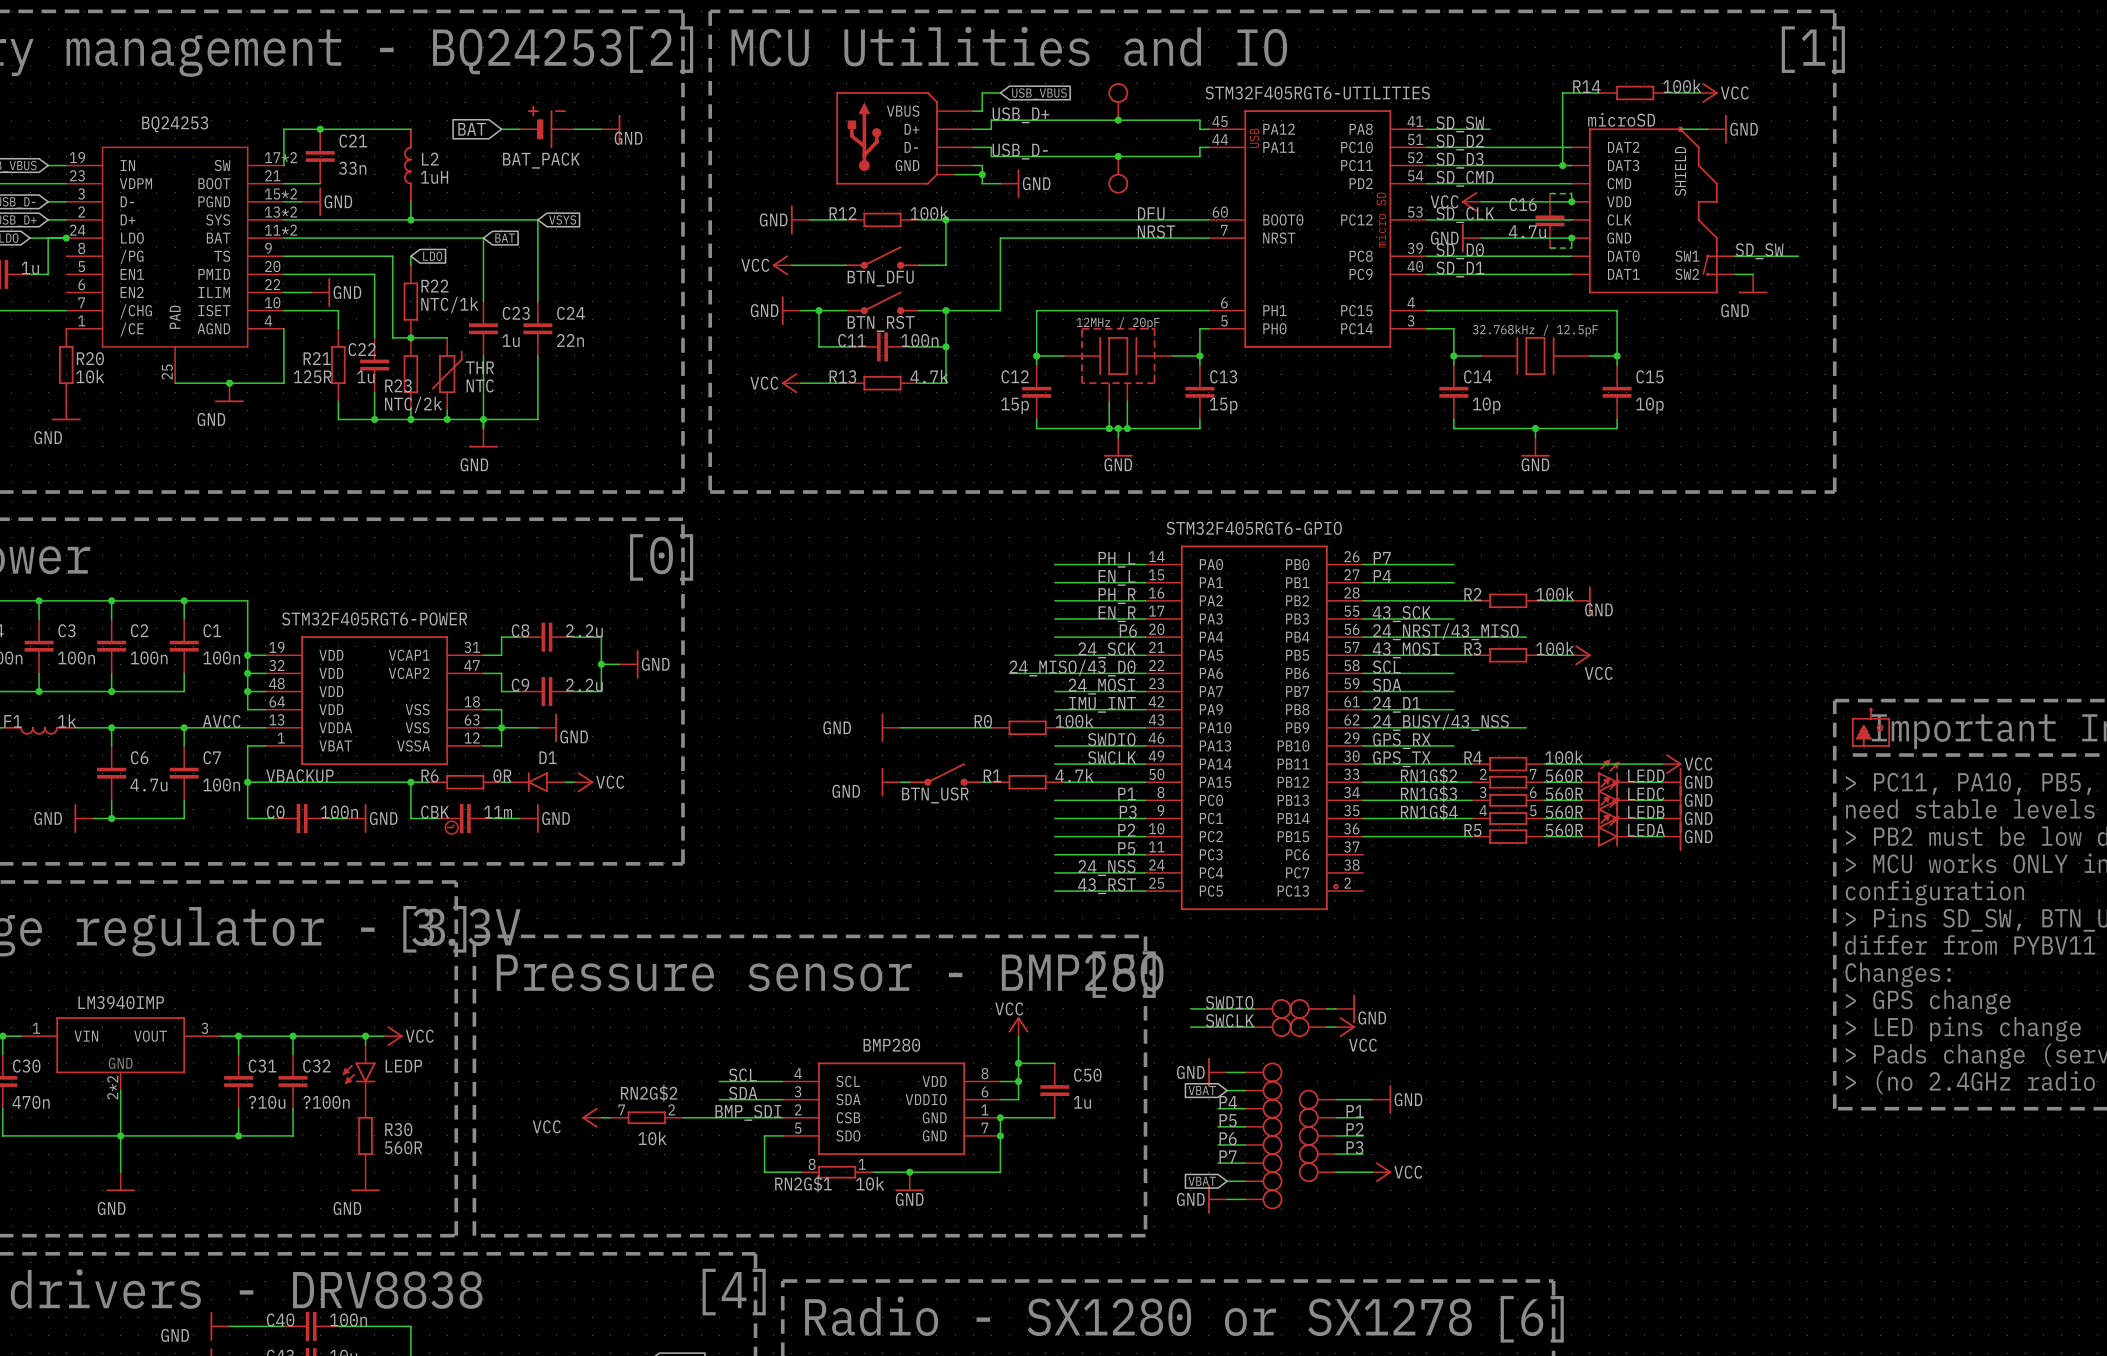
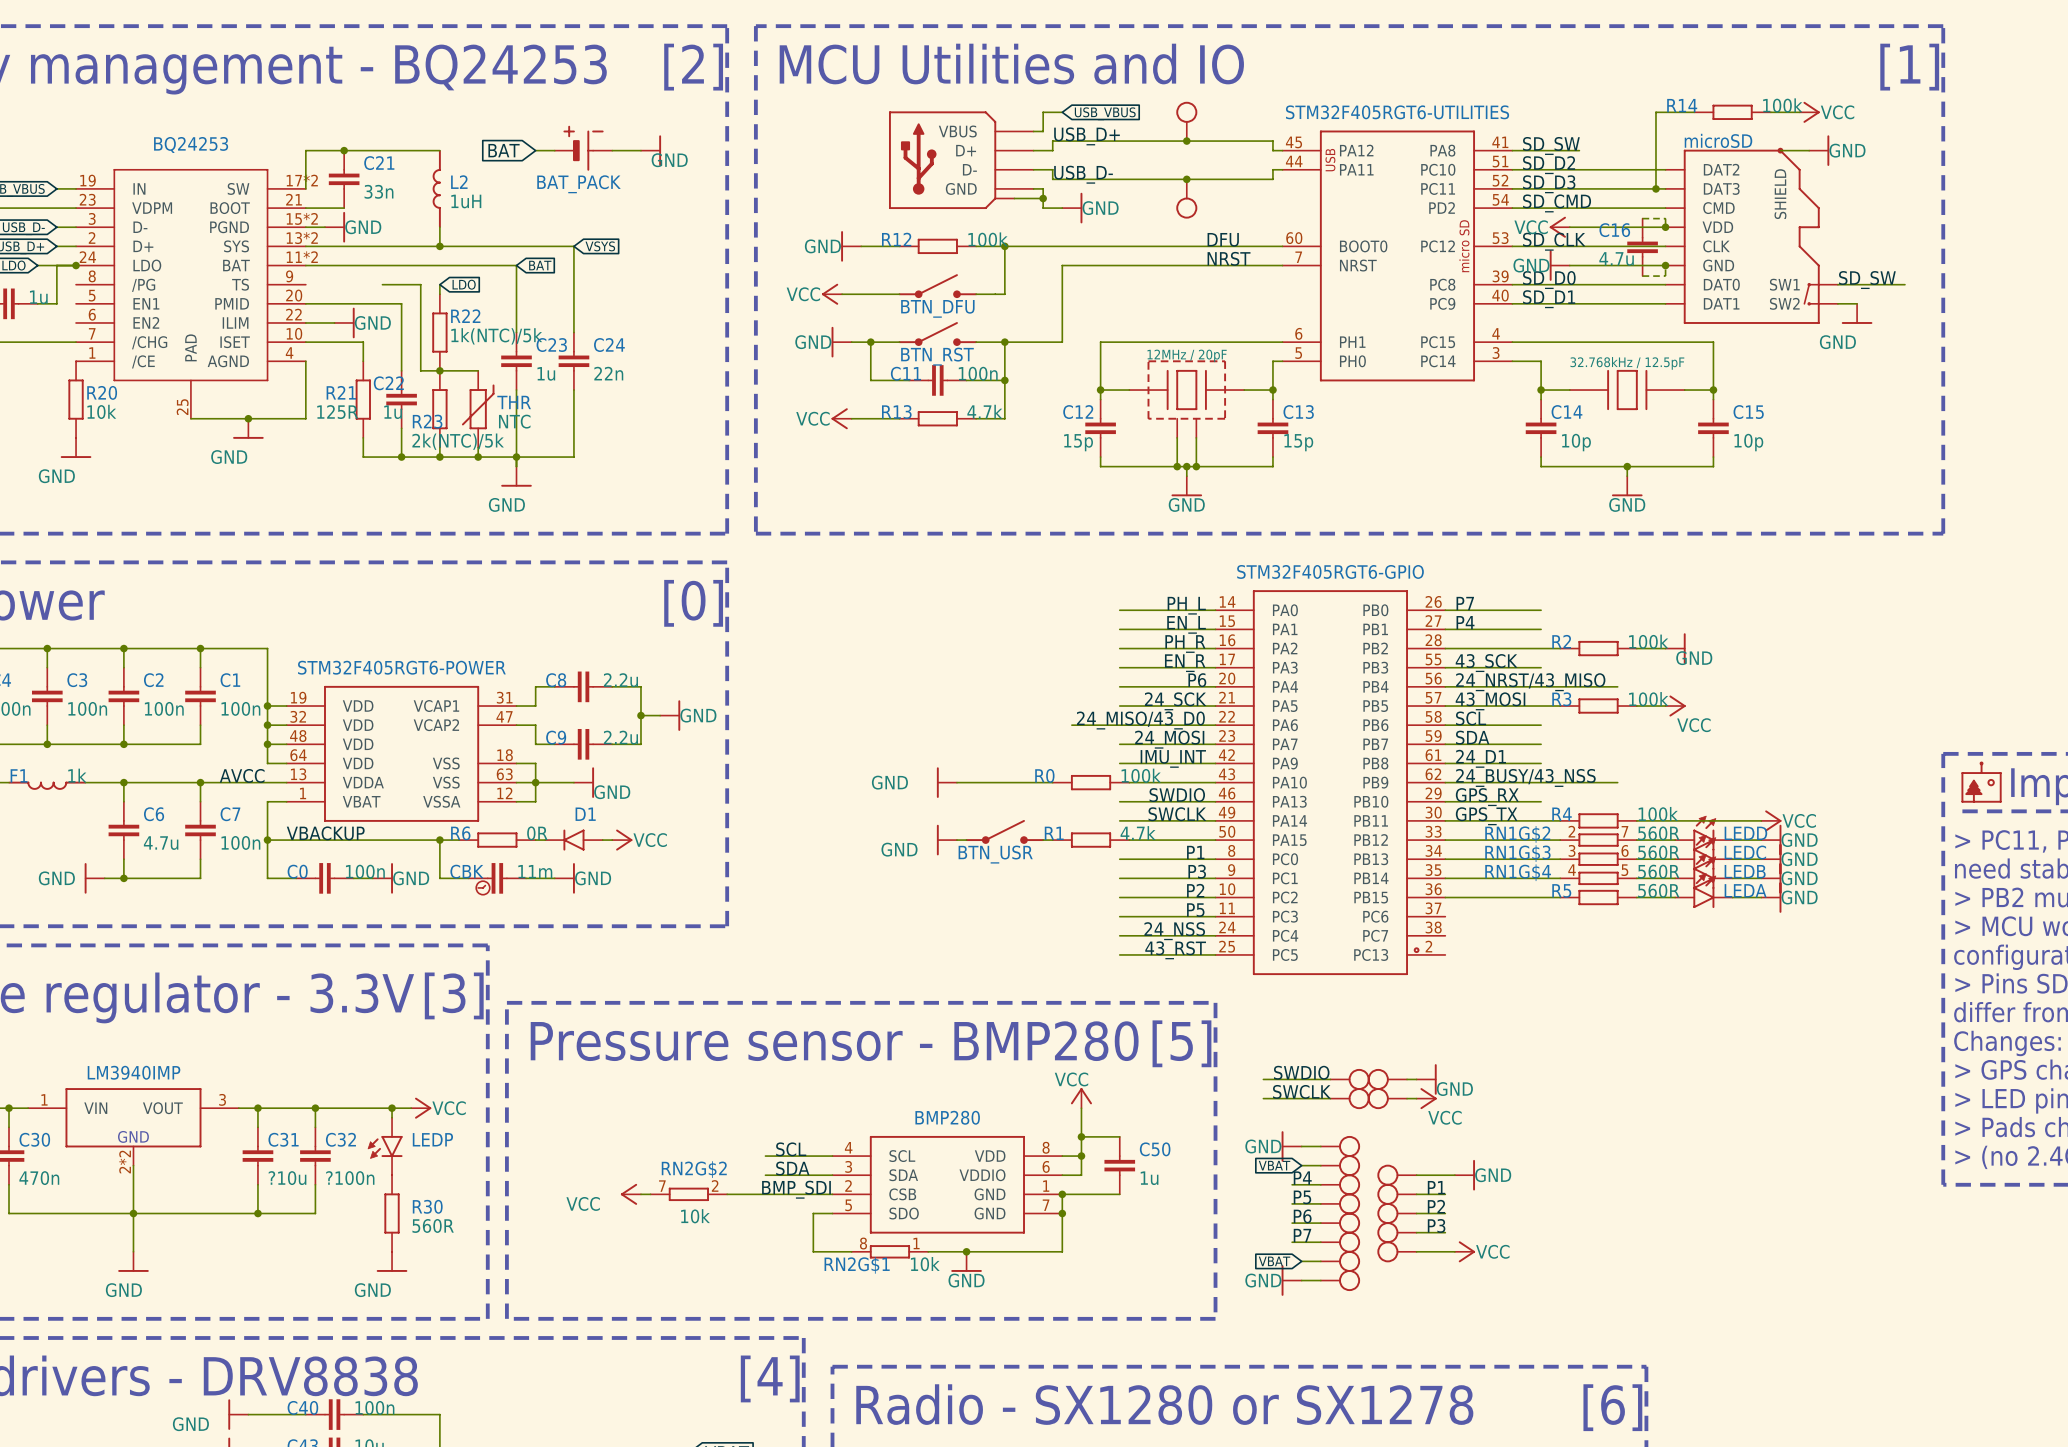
wire: (283, 256) (356, 256) -> none
R22 value: NTC/1k (449, 304) -> 1k(NTC)/5k (496, 336)
R23 value: NTC/2k (413, 404) -> 2k(NTC)/5k (458, 441)

